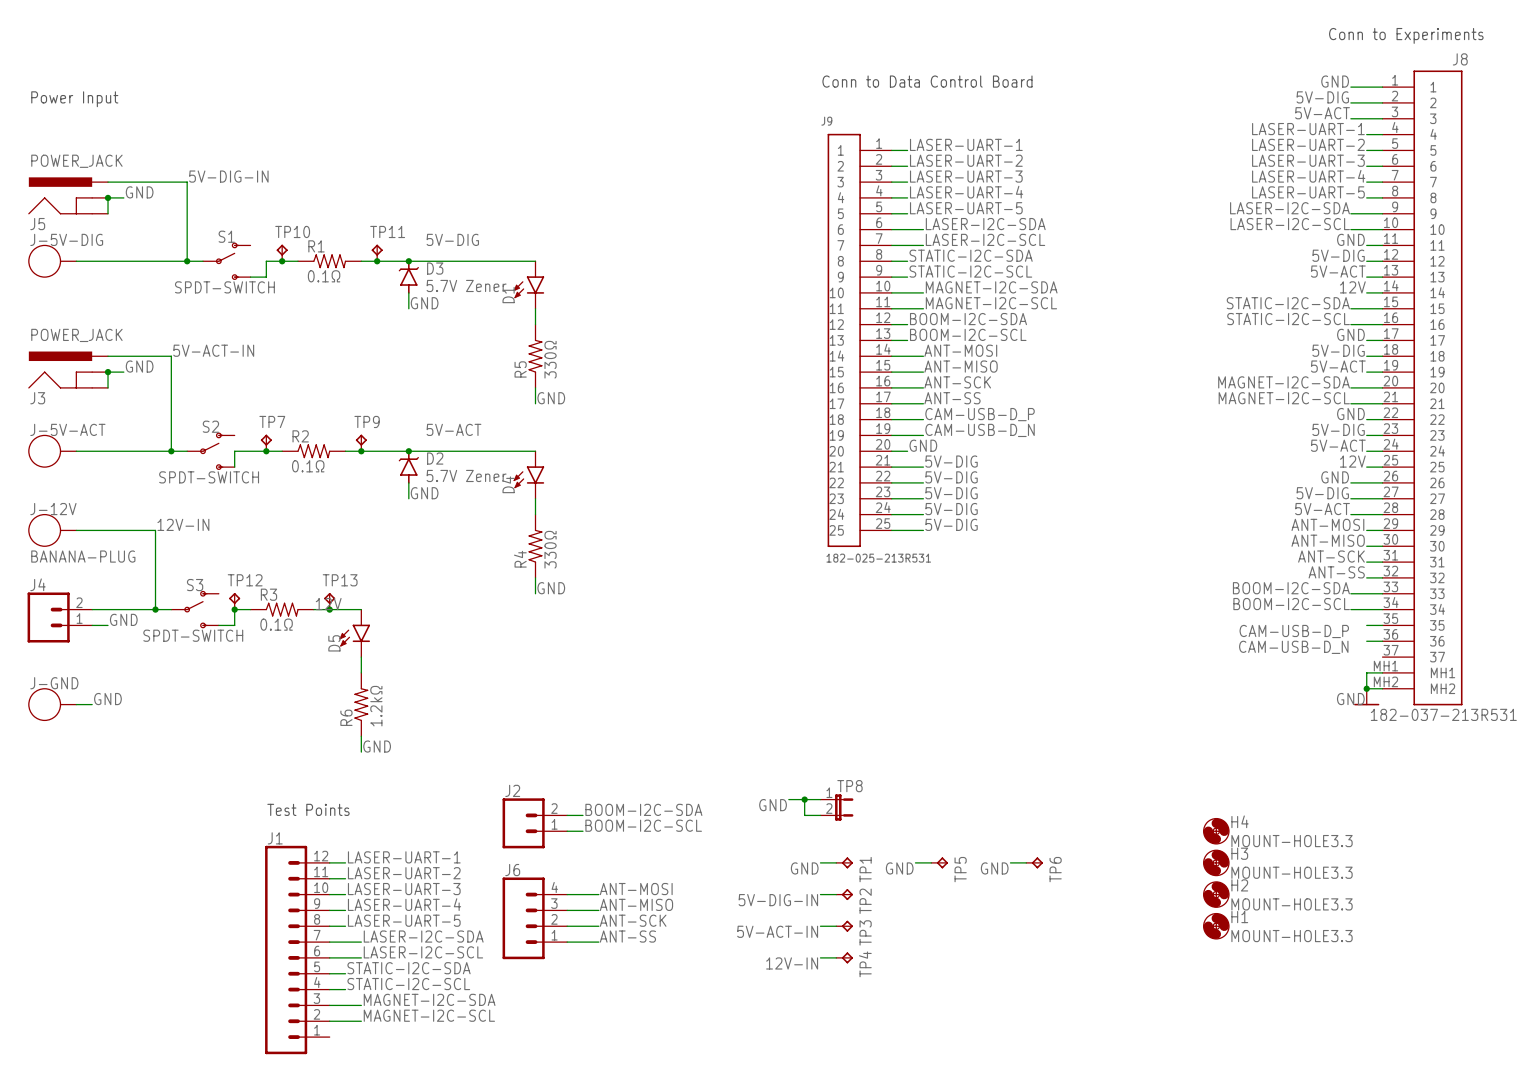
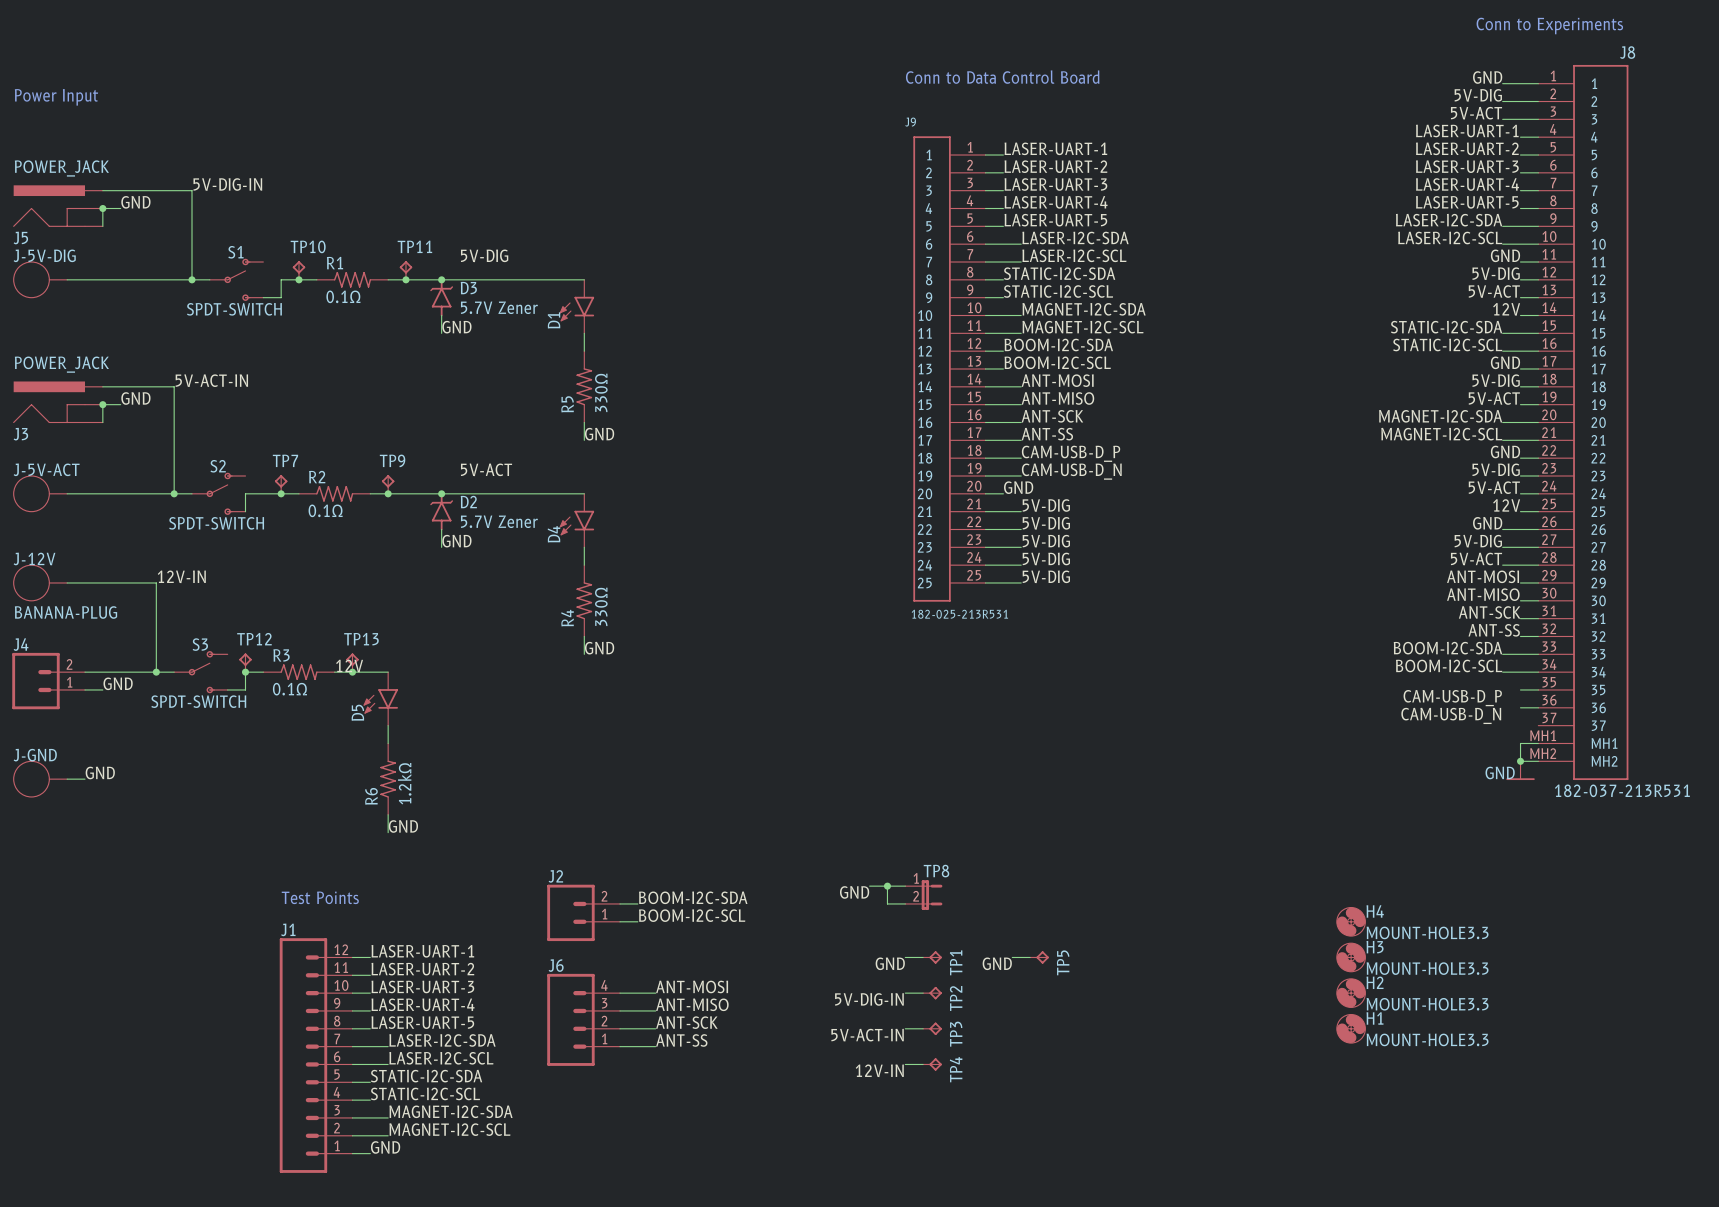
wire: (1010, 862) (1026, 862) -> none
TP6: (1034, 862) -> none
label: GND (994, 868) -> none
label: none -> GND (385, 1147)
wire: none -> (352, 1153) (370, 1153)

